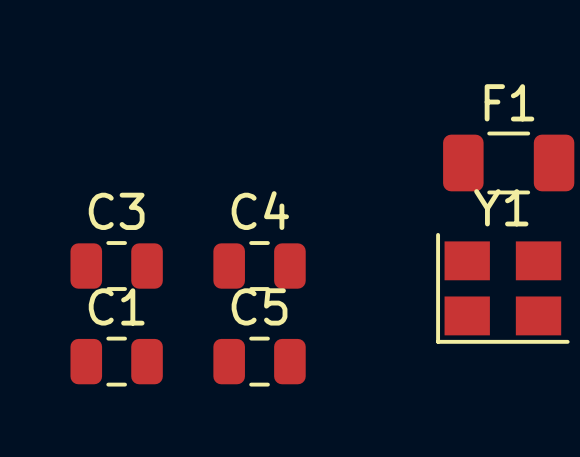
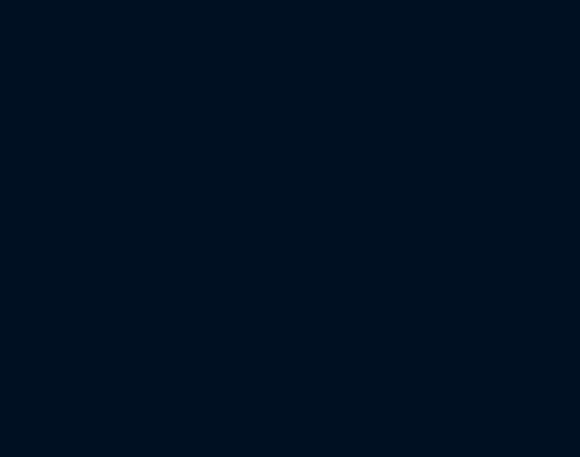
F1: (508, 162) -> none
C3: (116, 266) -> none
C4: (259, 266) -> none
Y1: (502, 288) -> none
C1: (116, 361) -> none
C5: (259, 361) -> none

